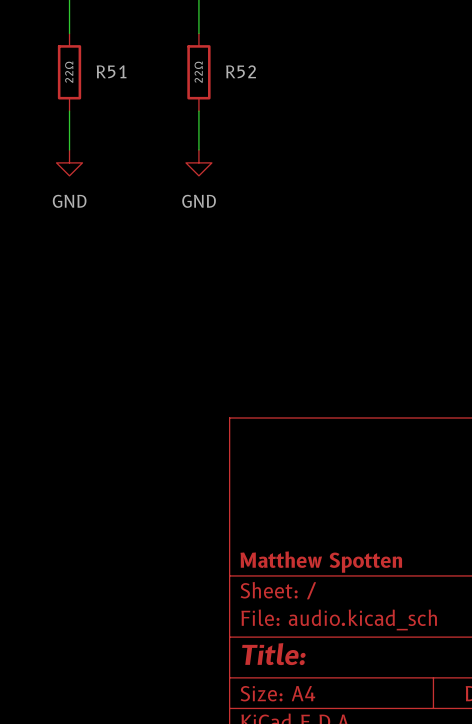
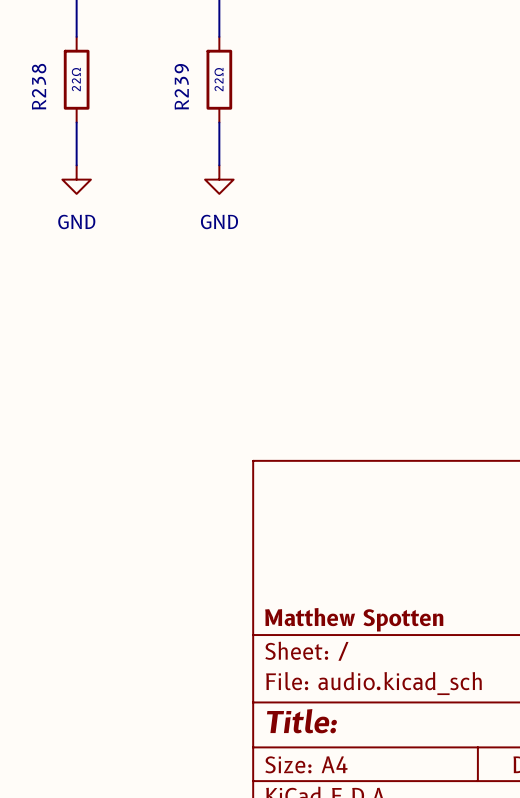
R51 name: R51 (111, 71) -> R238 (39, 86)
R52 name: R52 (241, 71) -> R239 (181, 86)

